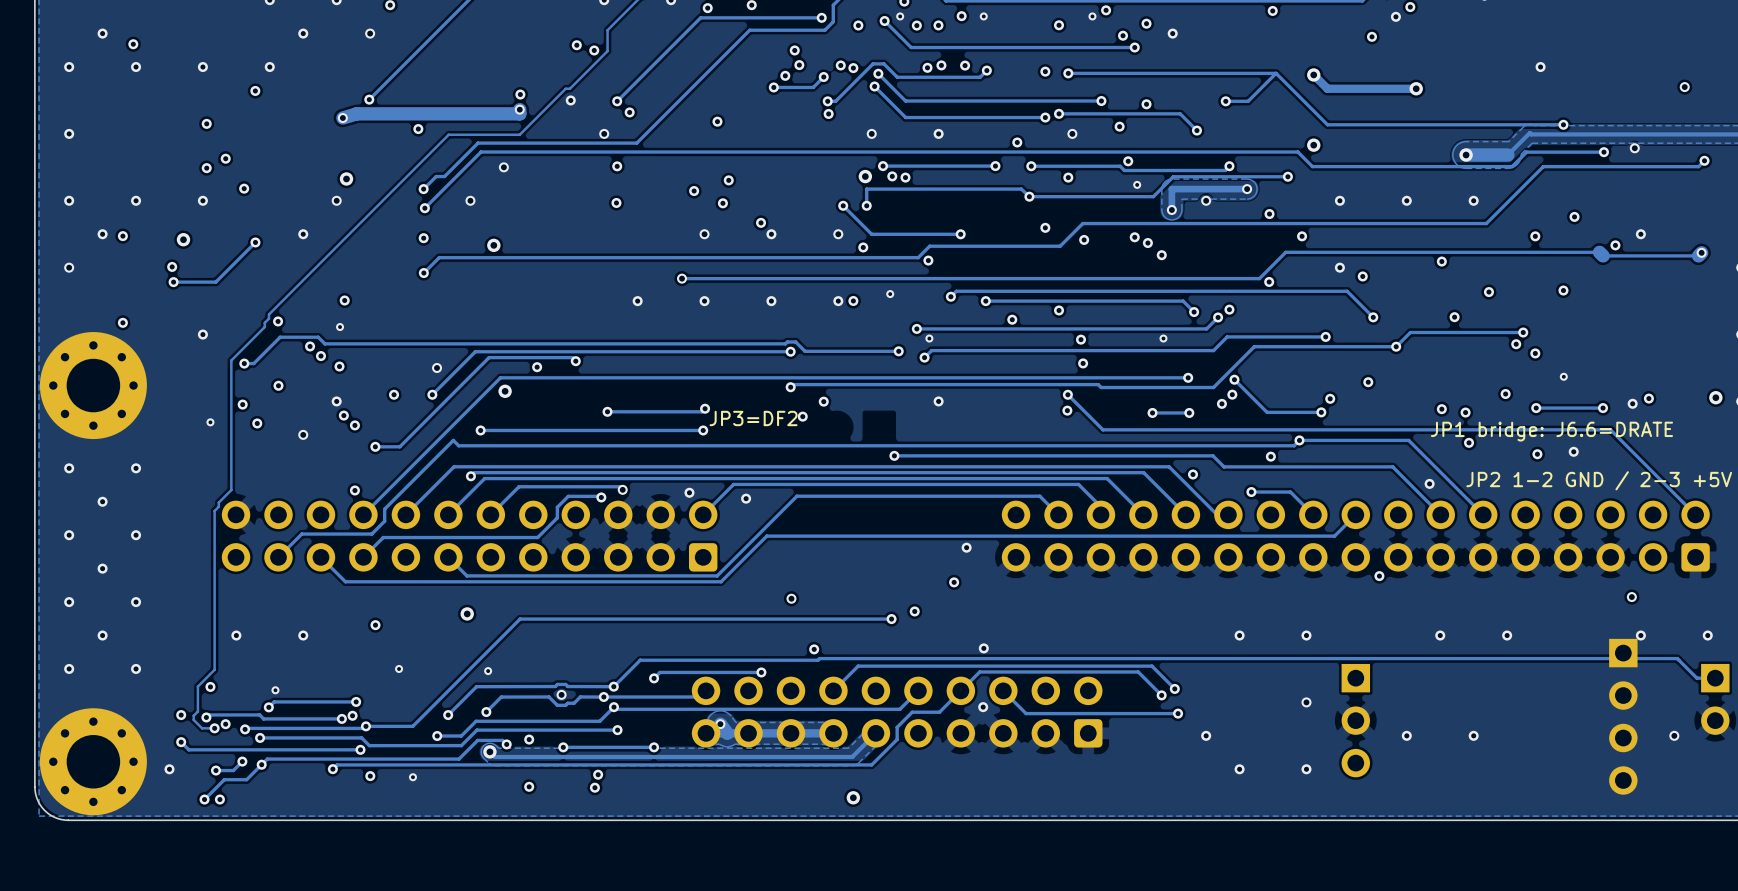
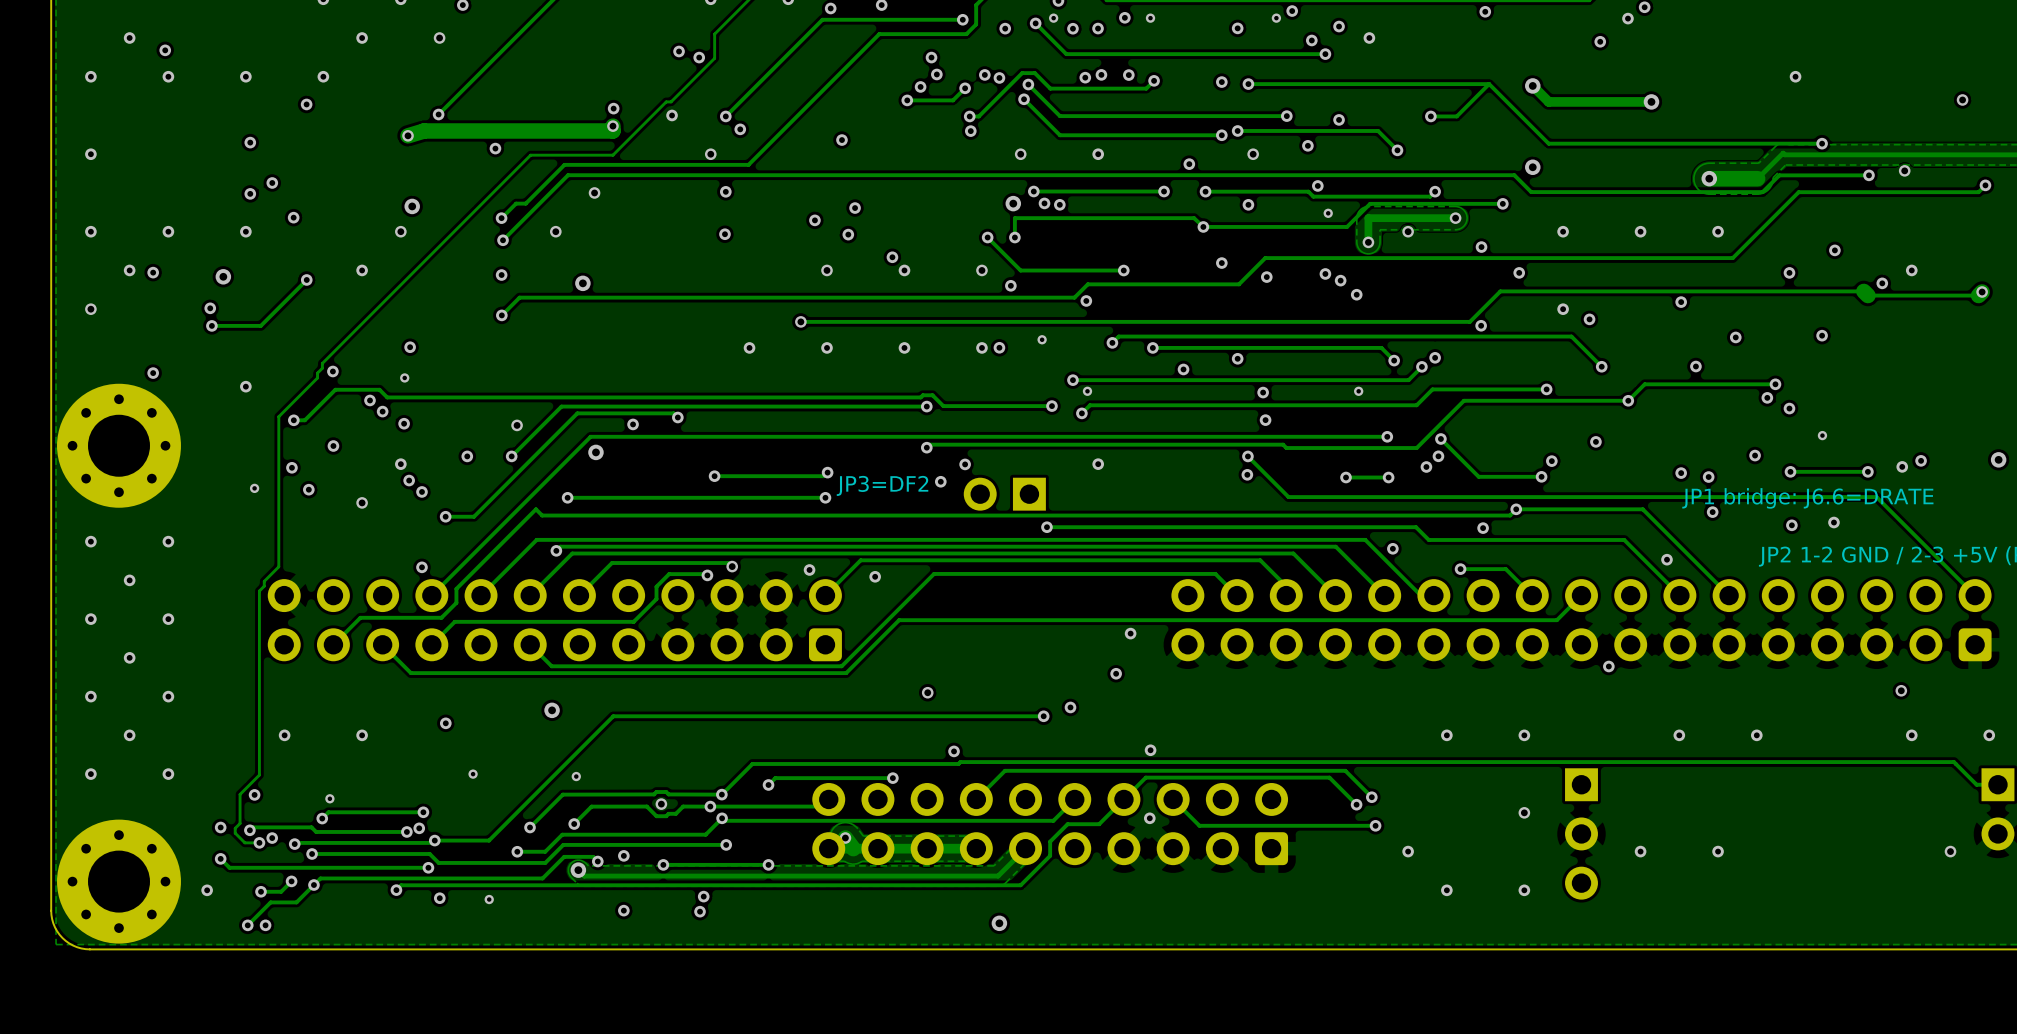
part: none -> (1004, 494)
part: (1623, 716) -> none

